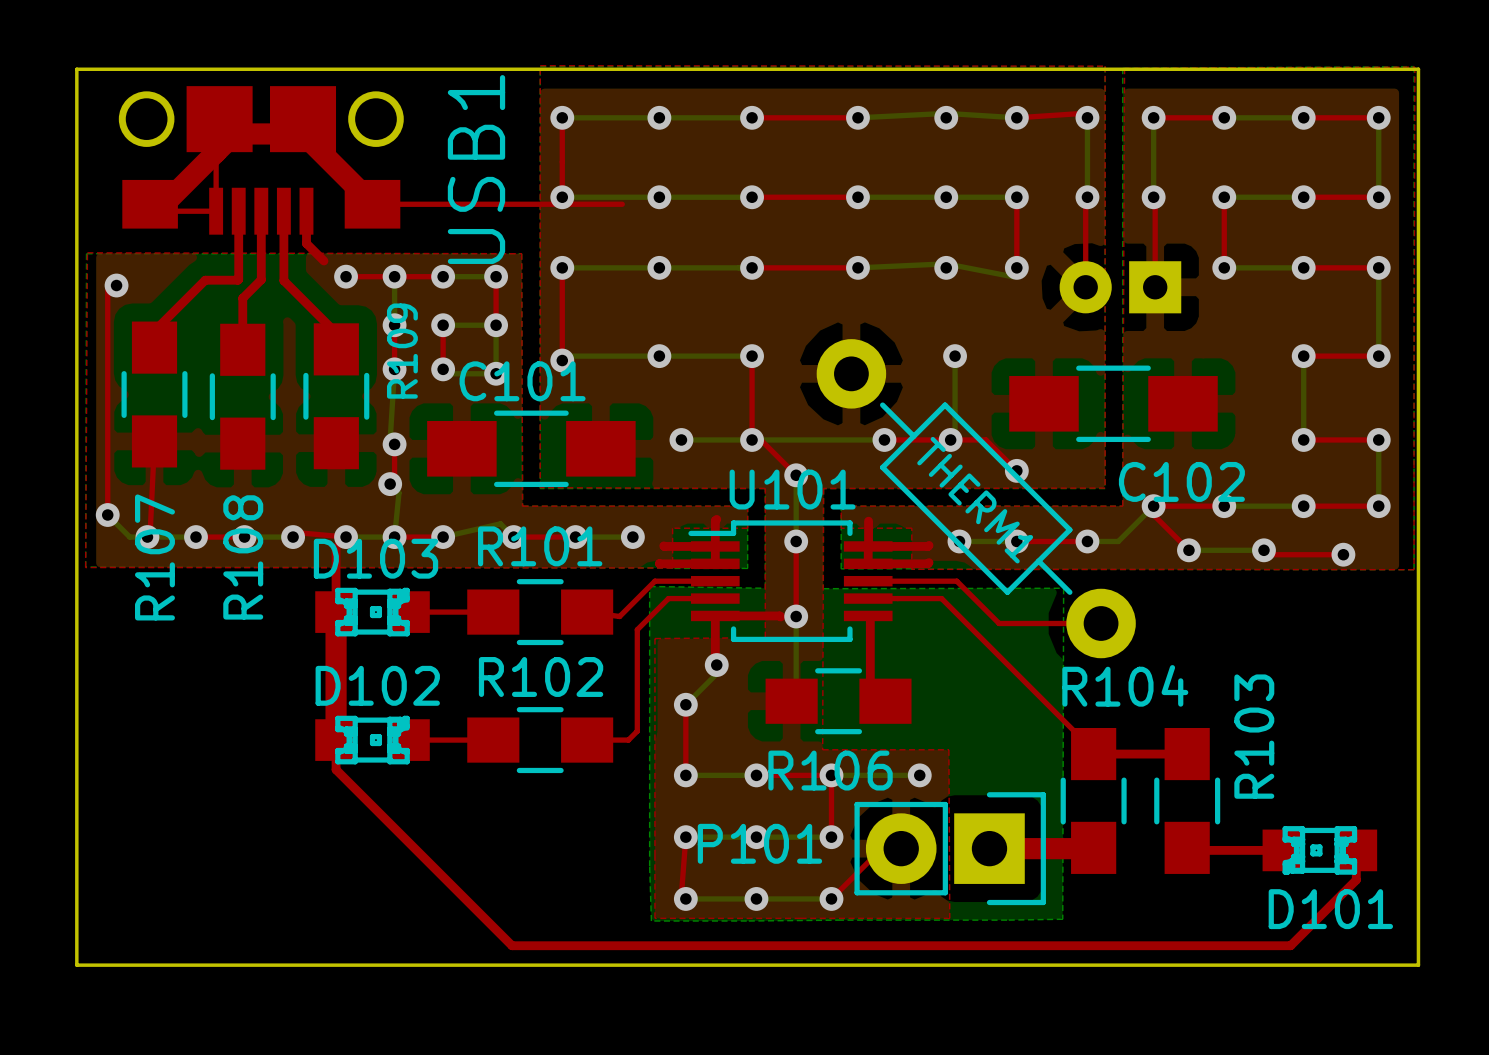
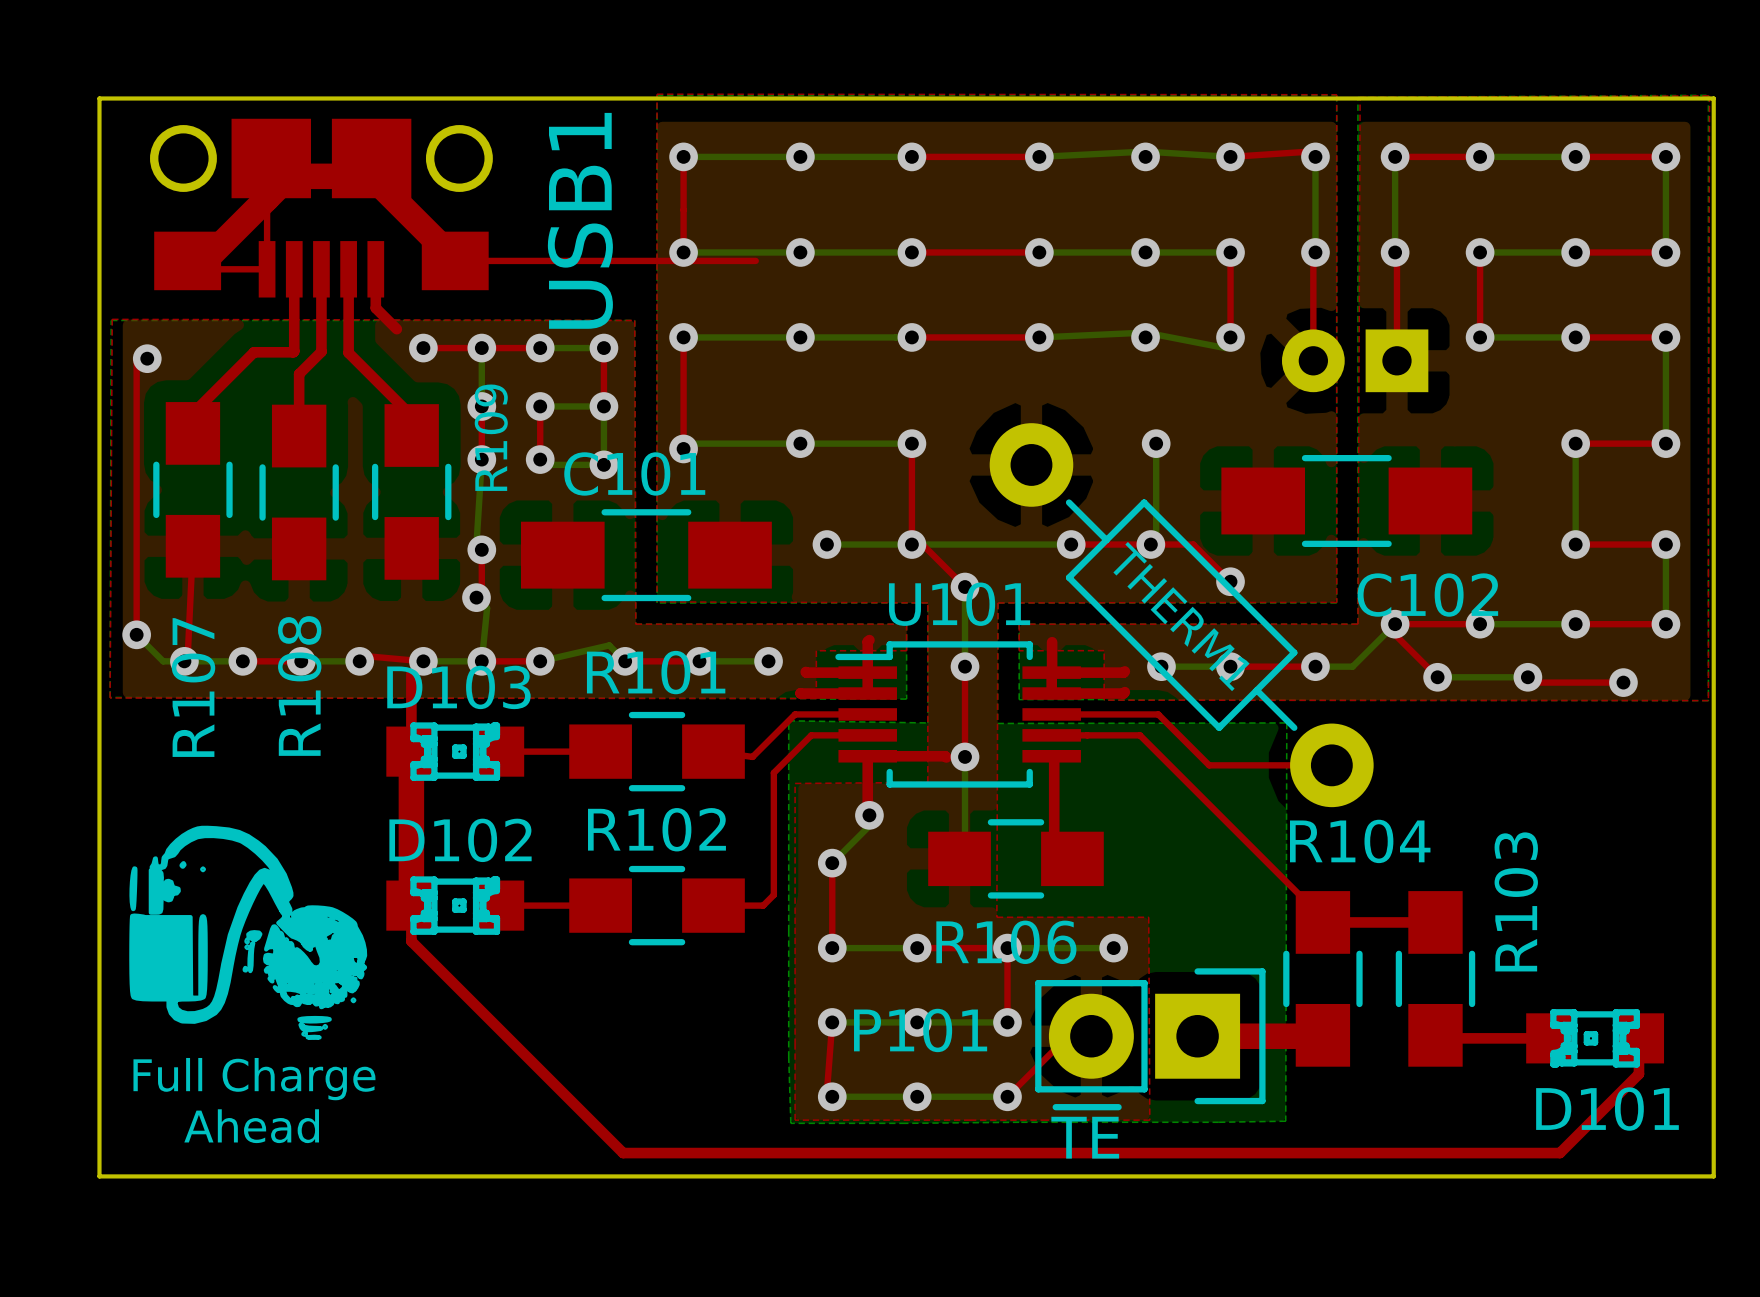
drawing: none -> [129, 825, 368, 1040]
text: none -> Full Charge (254, 1079)
text: none -> Ahead (251, 1126)
text: none -> ~{TE} (1085, 1132)

